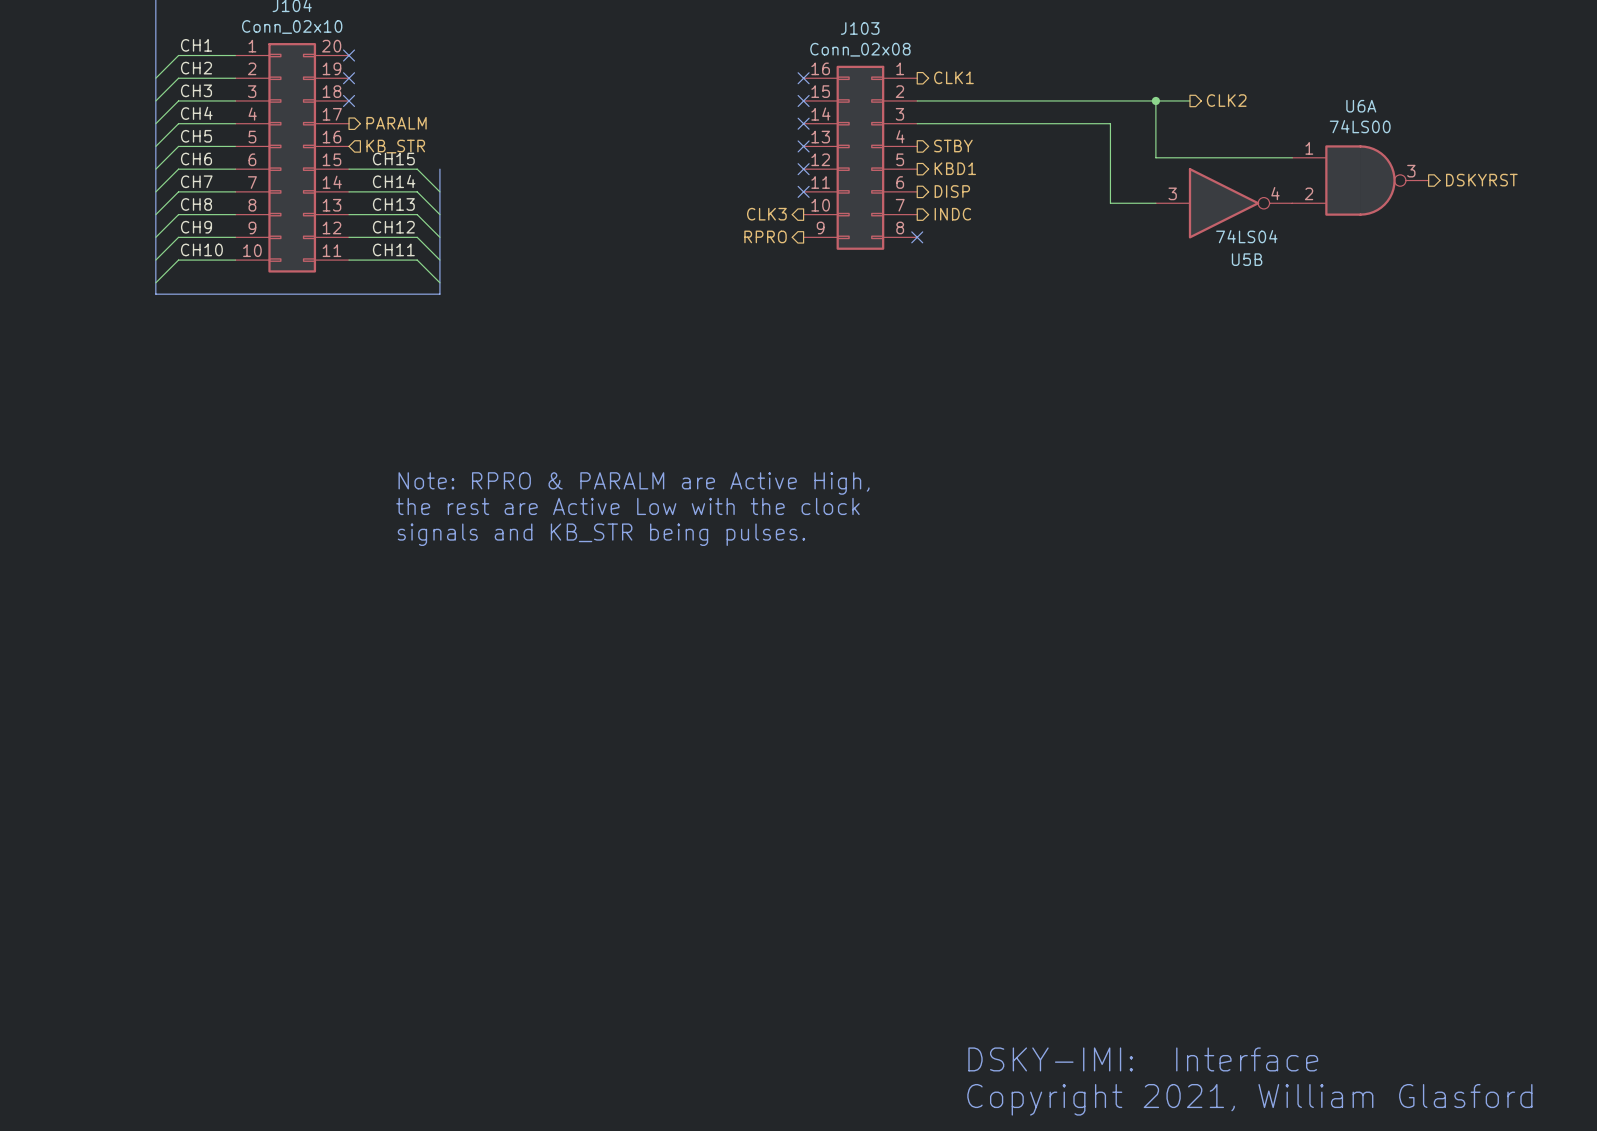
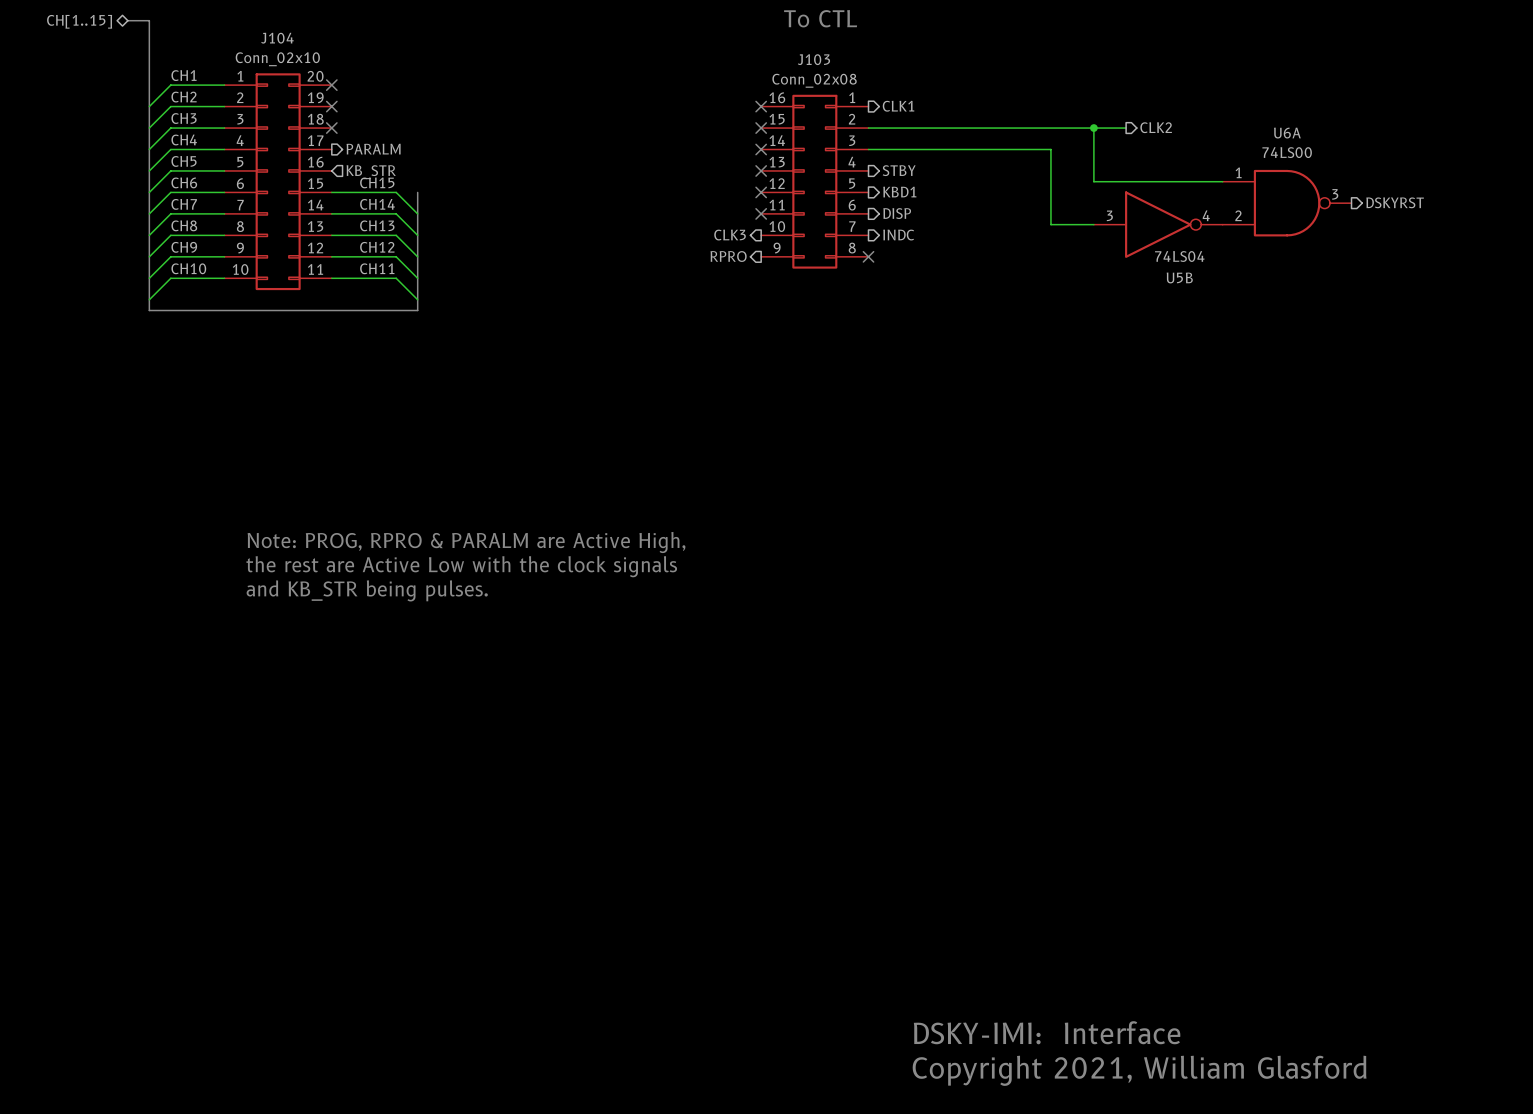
text: Note: RPRO & PARALM are Active High, (634, 483) -> none
text: the rest are Active Low with the clock (627, 506) -> none
text: signals and KB_STR being pulses. (601, 534) -> none
text: none -> Note: PROG, RPRO & PARALM are Active High, (466, 542)
text: none -> the rest are Active Low with the clock signals (461, 566)
text: none -> and KB_STR being pulses. (367, 590)

